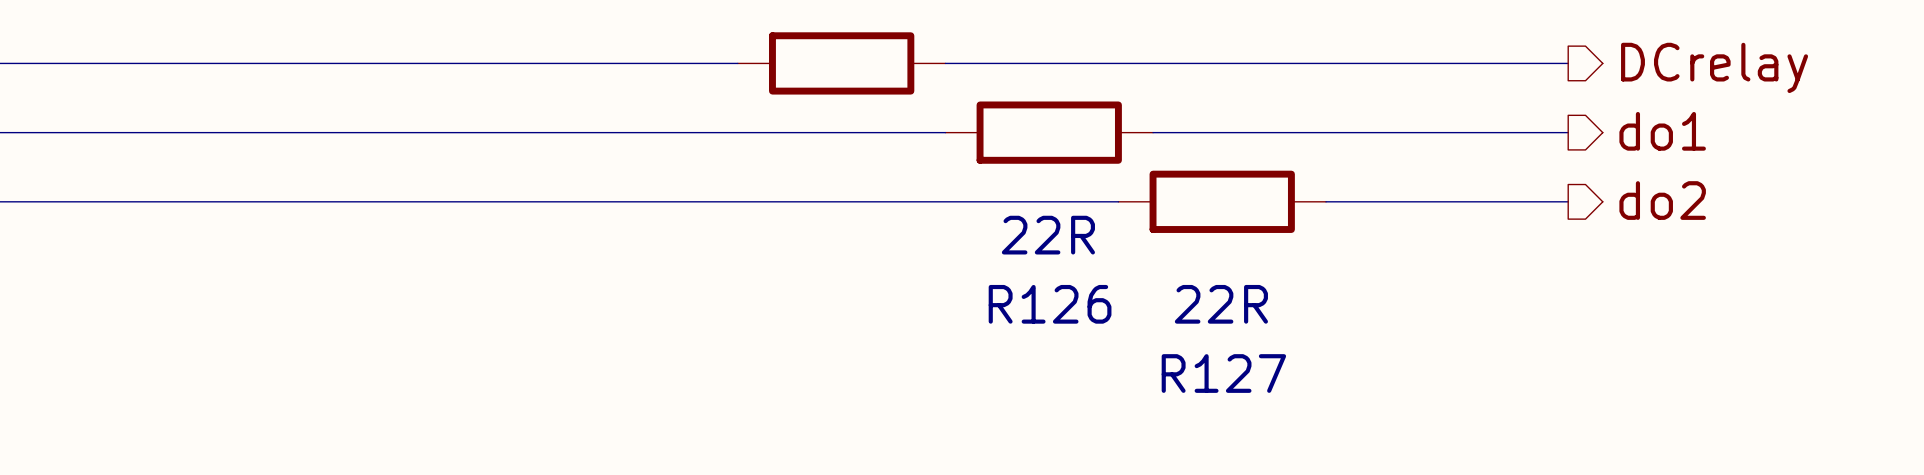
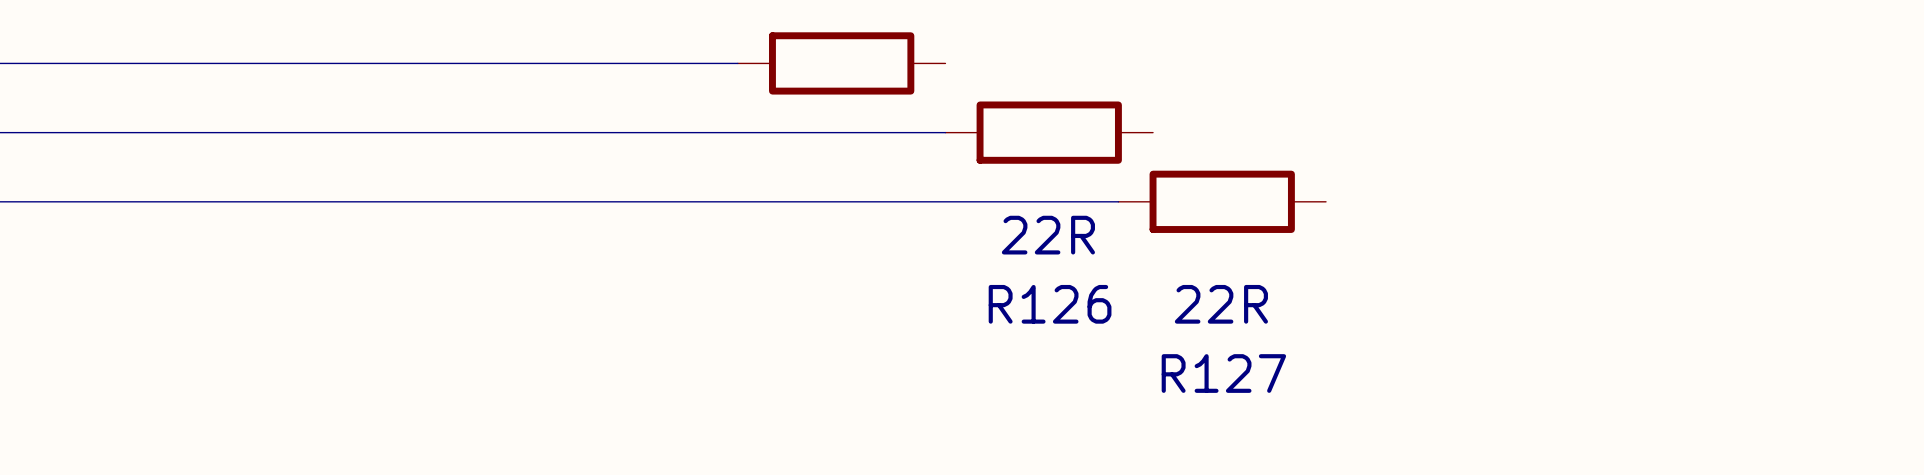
wire: (945, 63) (1568, 63) -> none
hierarchical label: DCrelay (1714, 67) -> none
hierarchical label: do1 (1662, 131) -> none
wire: (1153, 132) (1568, 132) -> none
hierarchical label: do2 (1662, 200) -> none
wire: (1326, 201) (1568, 201) -> none

